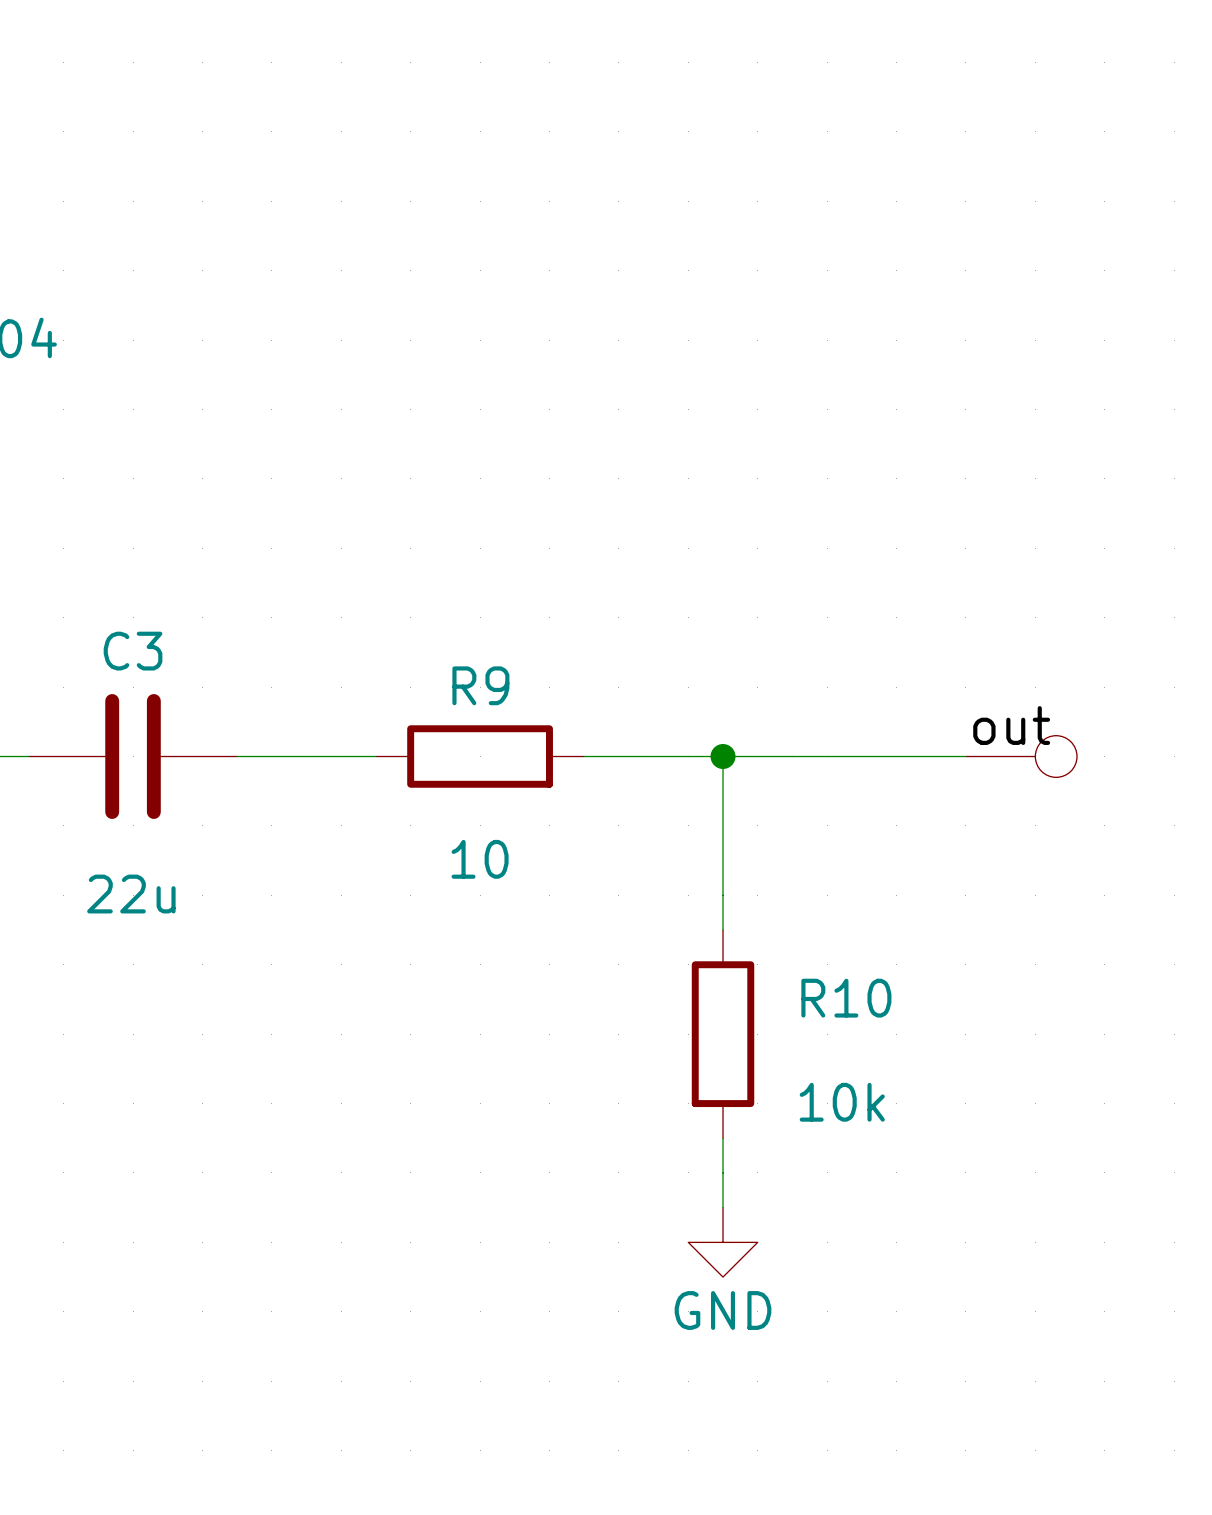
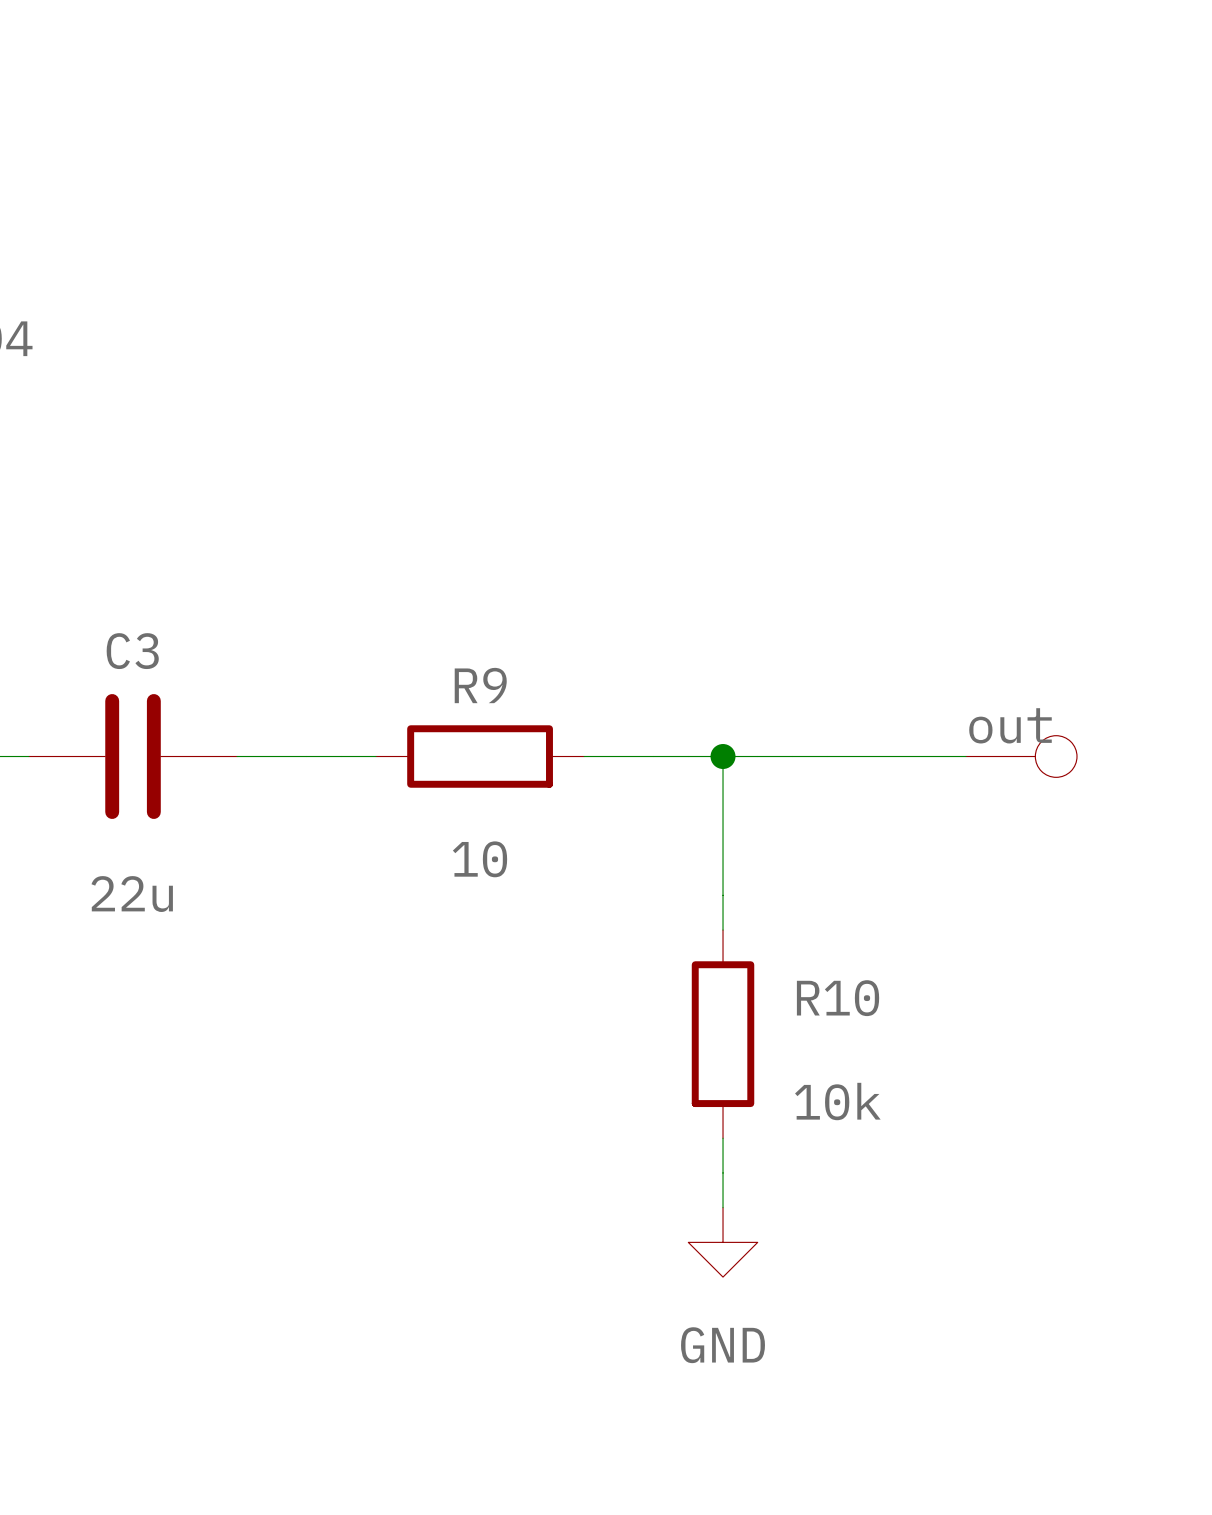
power symbol text position: GND (723, 1310) -> GND (723, 1345)

